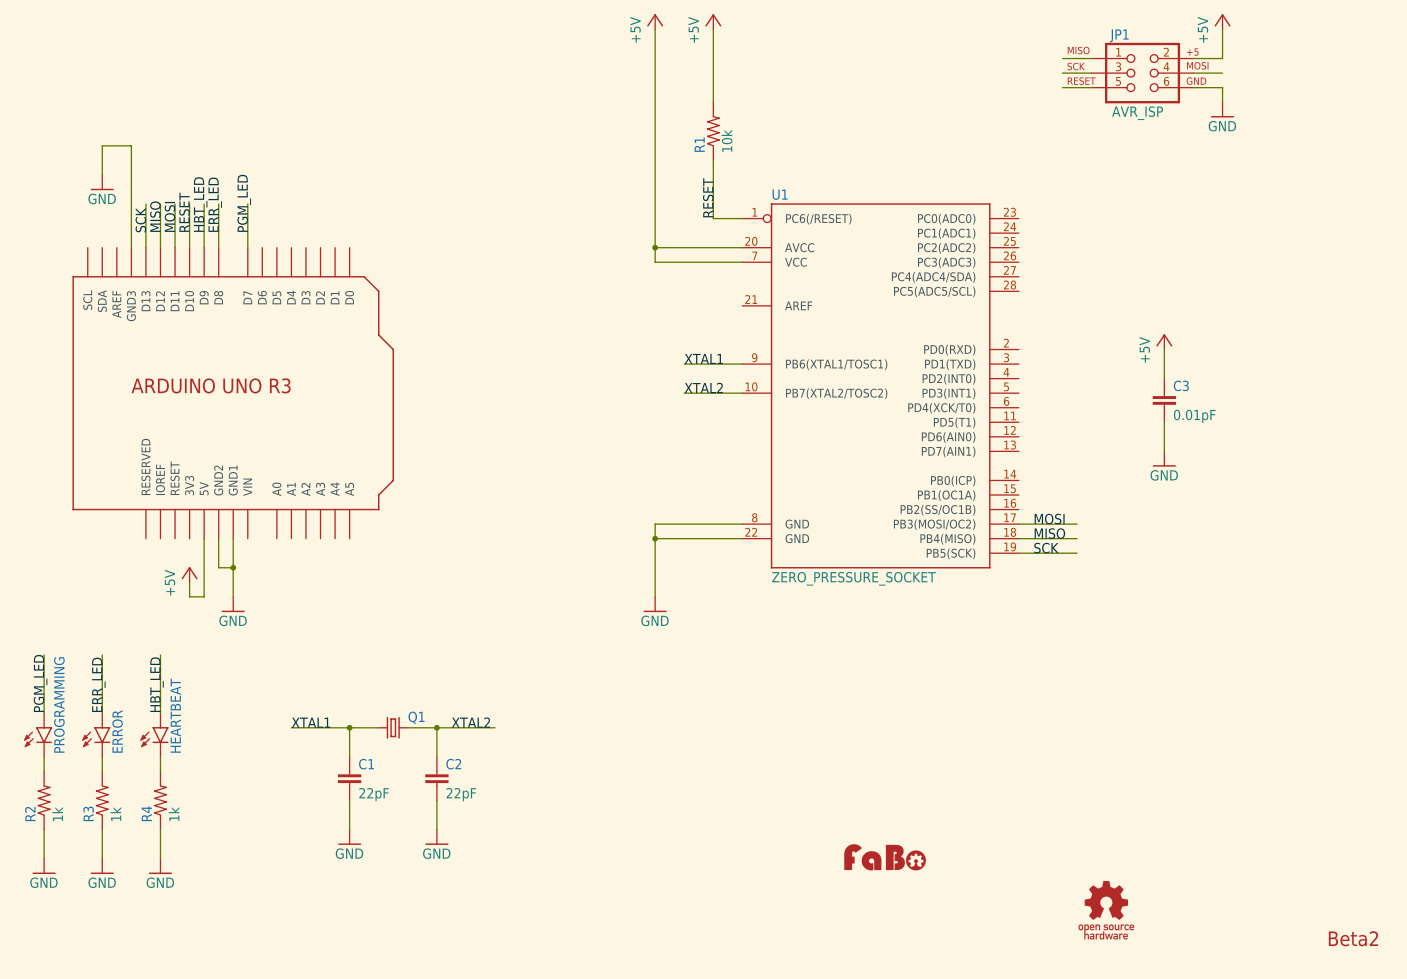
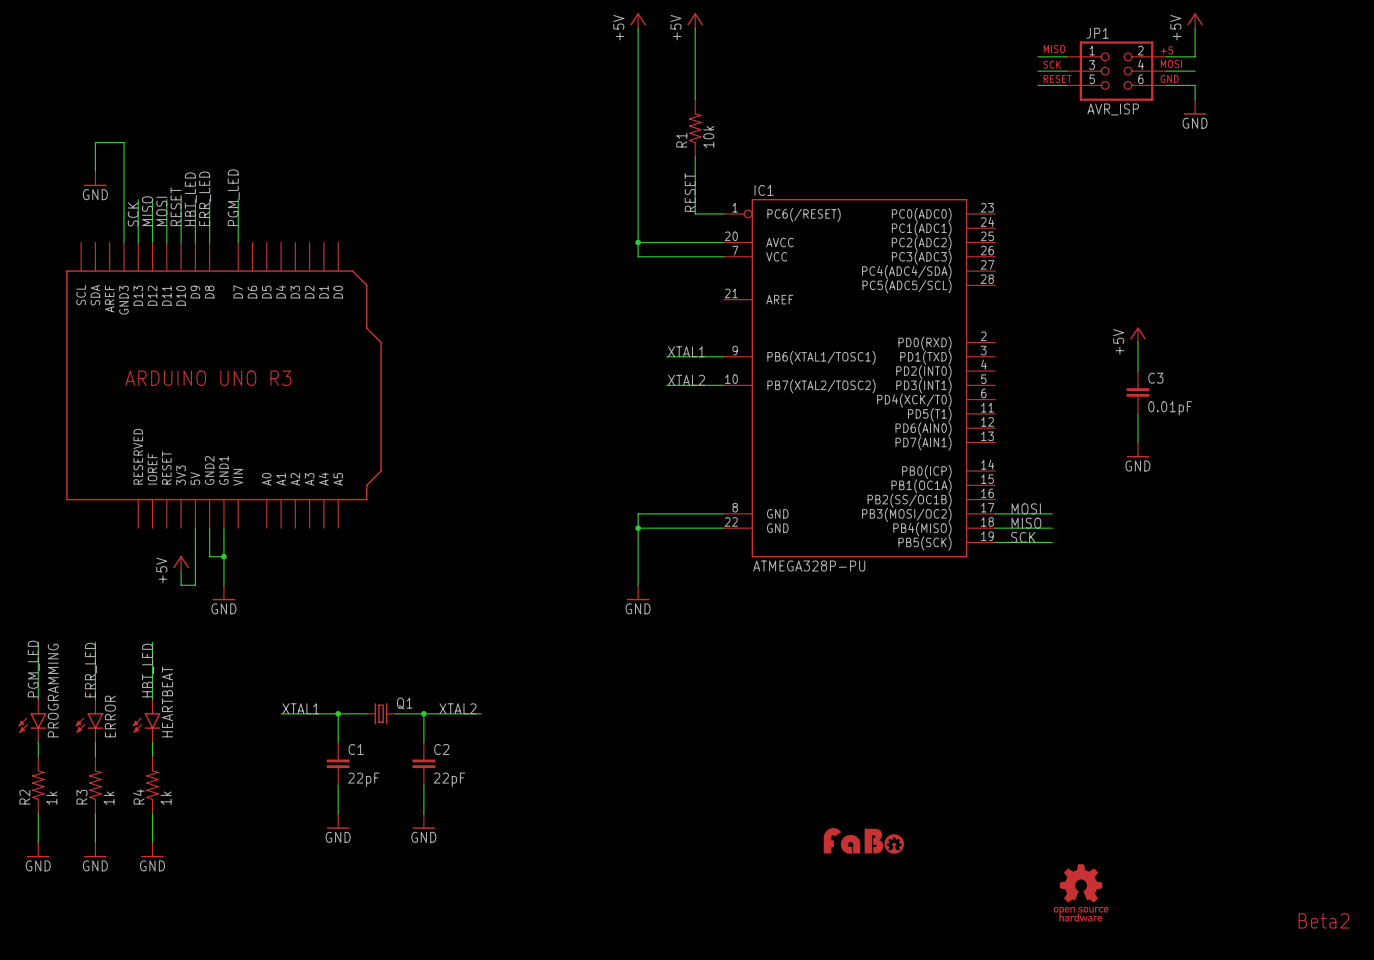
U1 name: U1 (780, 194) -> IC1 (764, 190)
U1 value: ZERO_PRESSURE_SOCKET (854, 578) -> ATMEGA328P-PU (809, 566)

